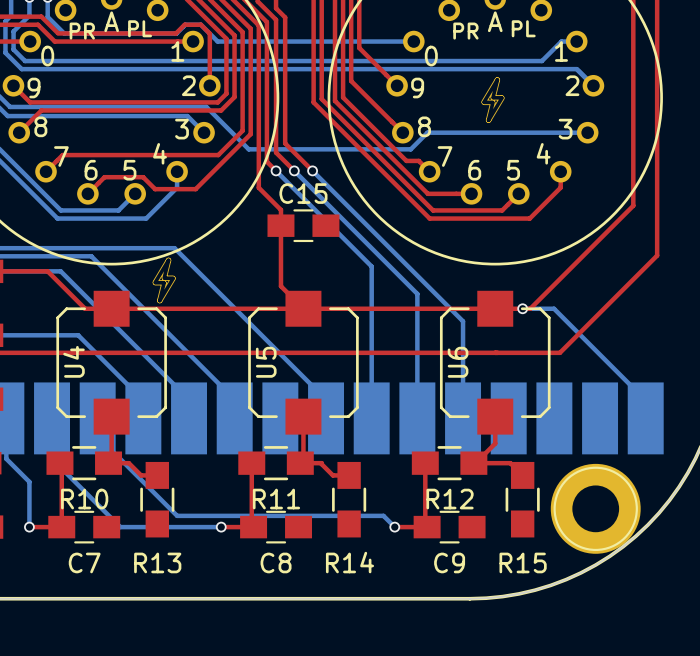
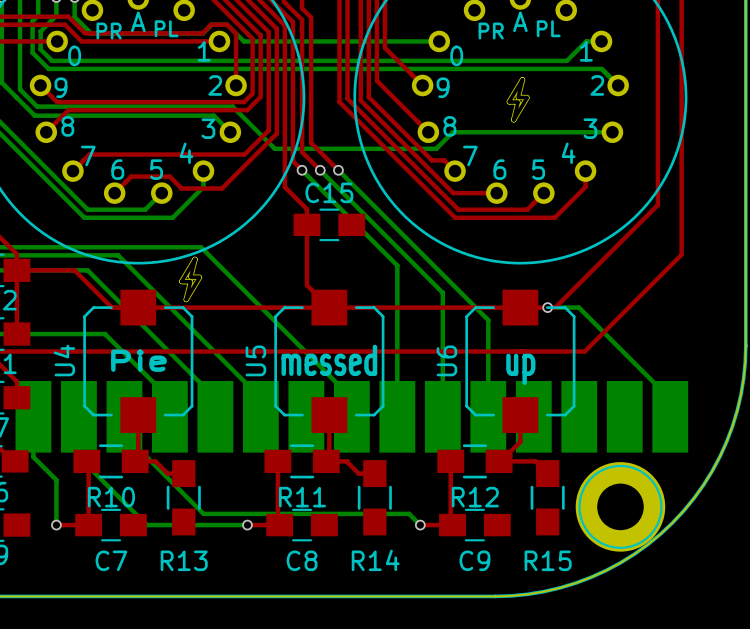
U4 name position: U4 (74, 361) -> U4 (64, 360)
text: none -> messed (329, 360)
text: none -> Pie (138, 360)
U5 name position: U5 (266, 362) -> U5 (255, 360)
U6 name position: U6 (458, 362) -> U6 (446, 360)
text: none -> up (520, 369)

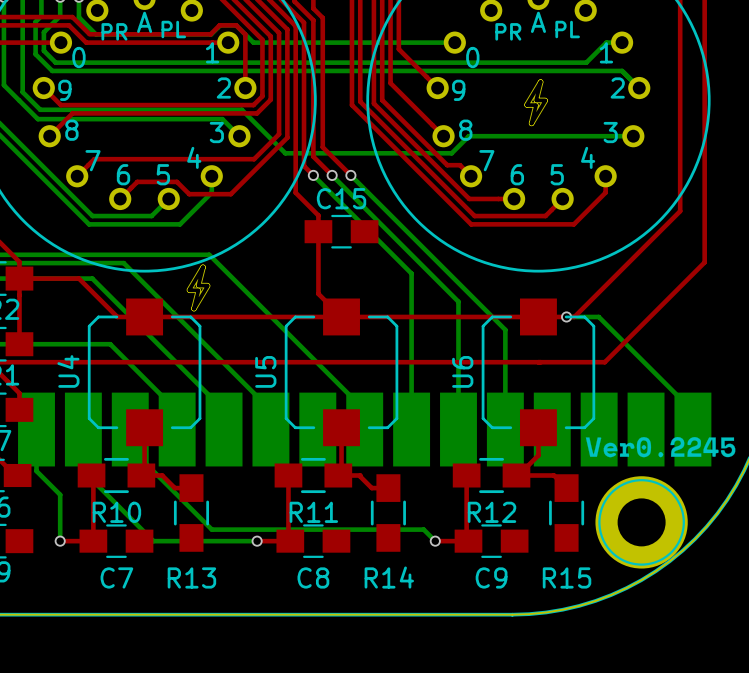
text: Pie (138, 360) -> none
text: messed (329, 360) -> none
text: up (520, 369) -> none
drawing: none -> [585, 436, 736, 458]

